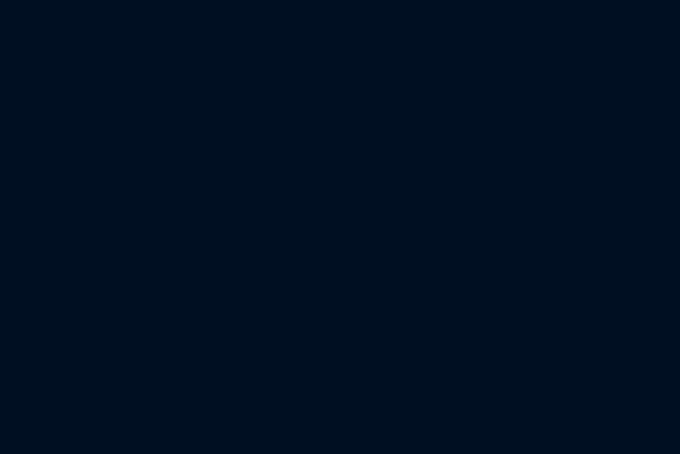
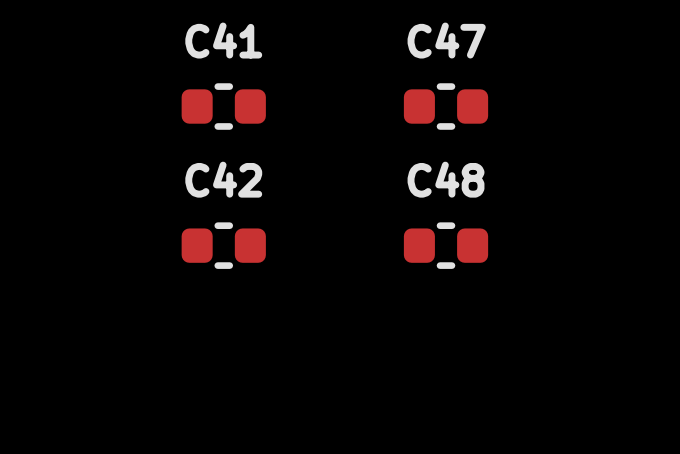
C41: none -> (223, 106)
C47: none -> (446, 106)
C42: none -> (223, 245)
C48: none -> (446, 245)

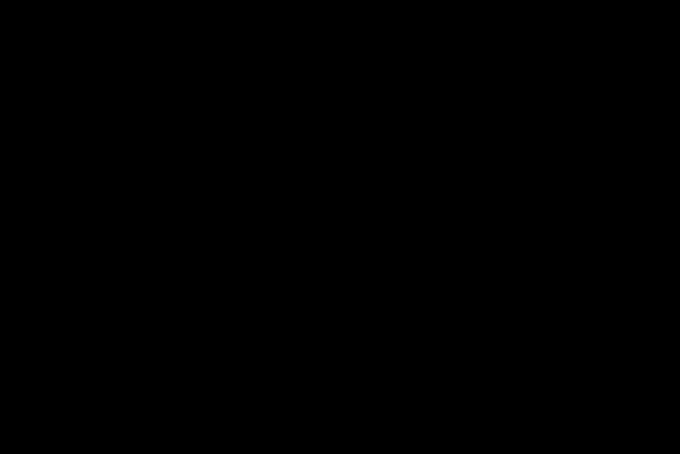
C41: (223, 106) -> none
C47: (446, 106) -> none
C42: (223, 245) -> none
C48: (446, 245) -> none

